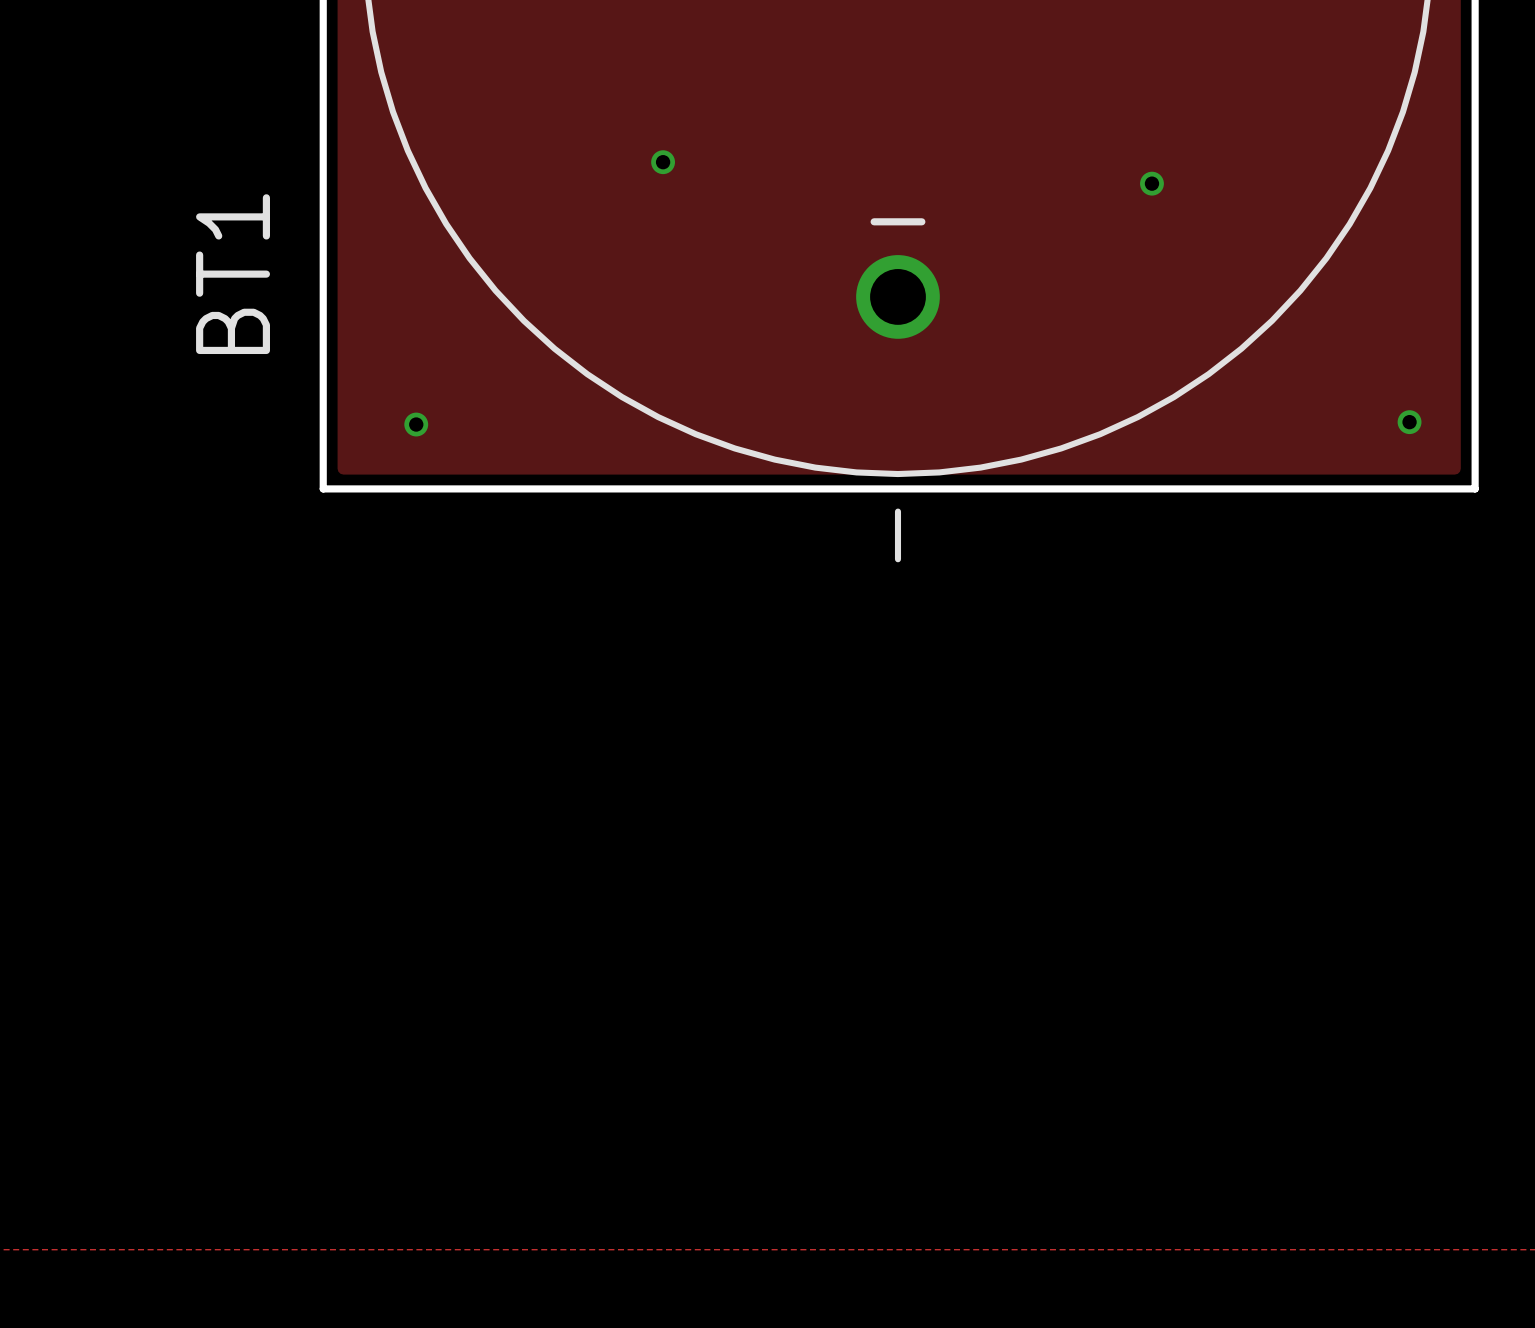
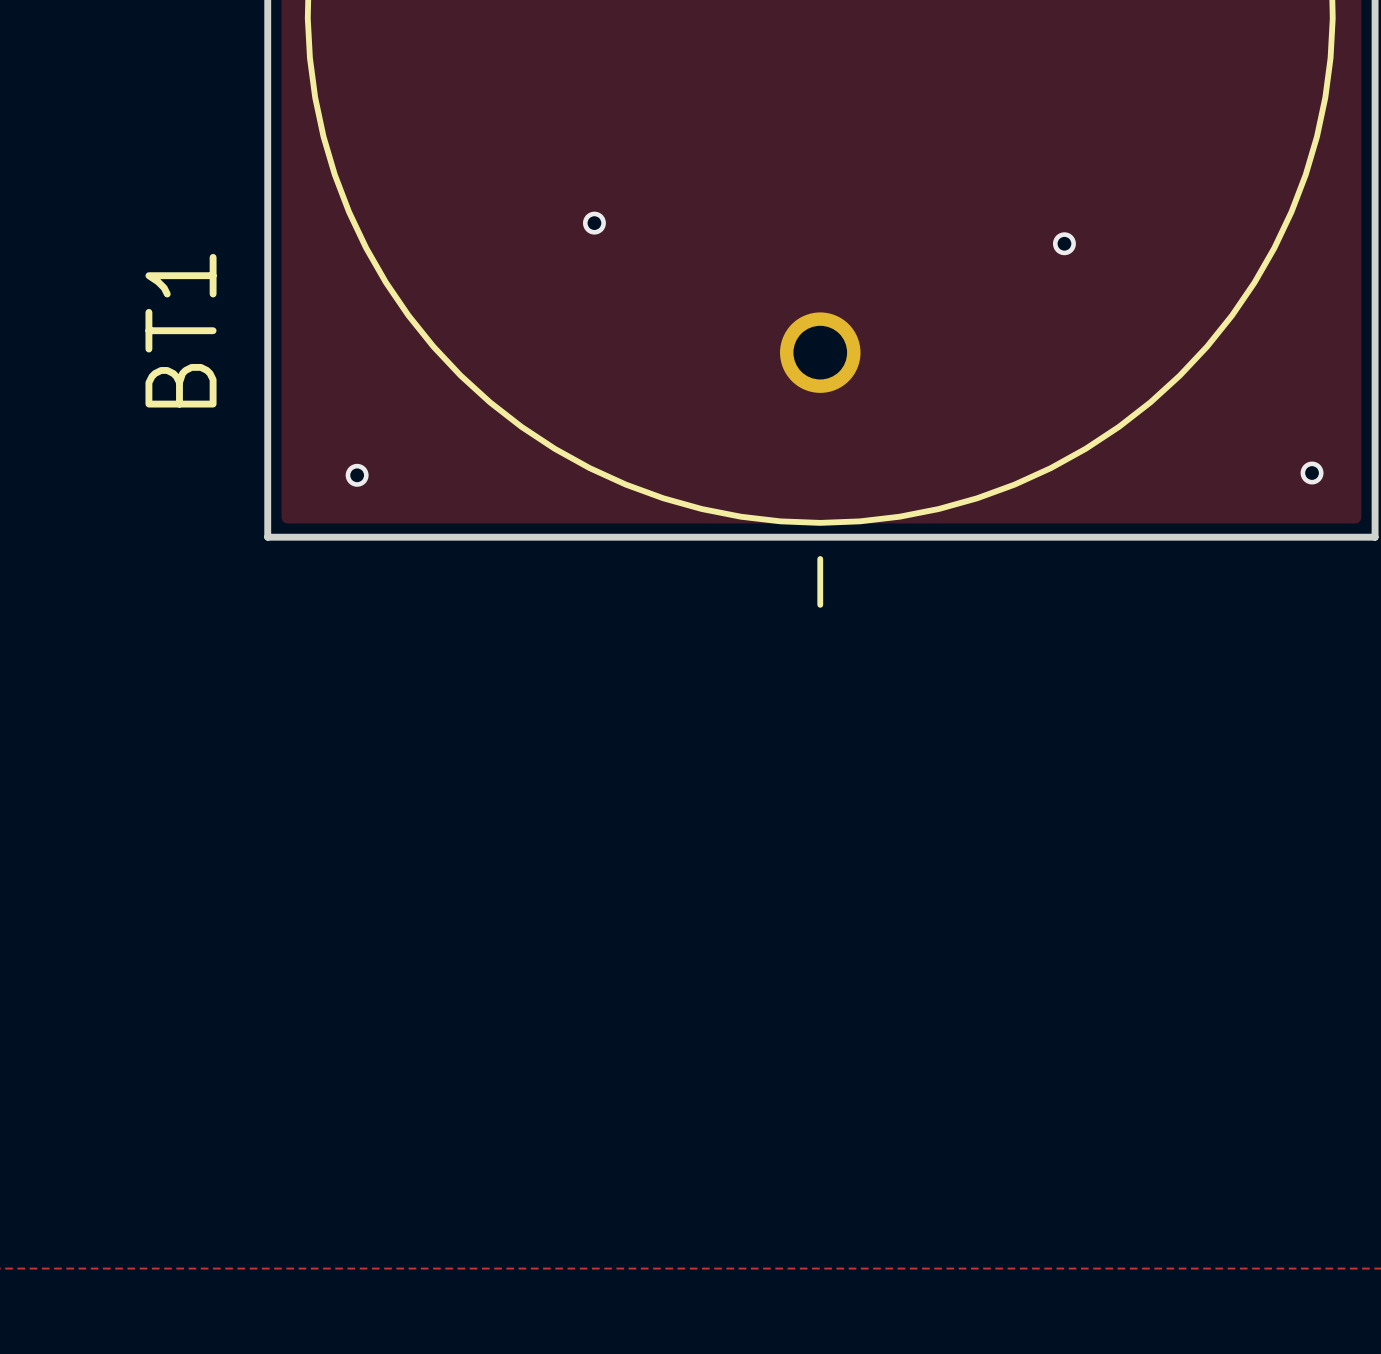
line: (874, 221) (921, 221) -> none

